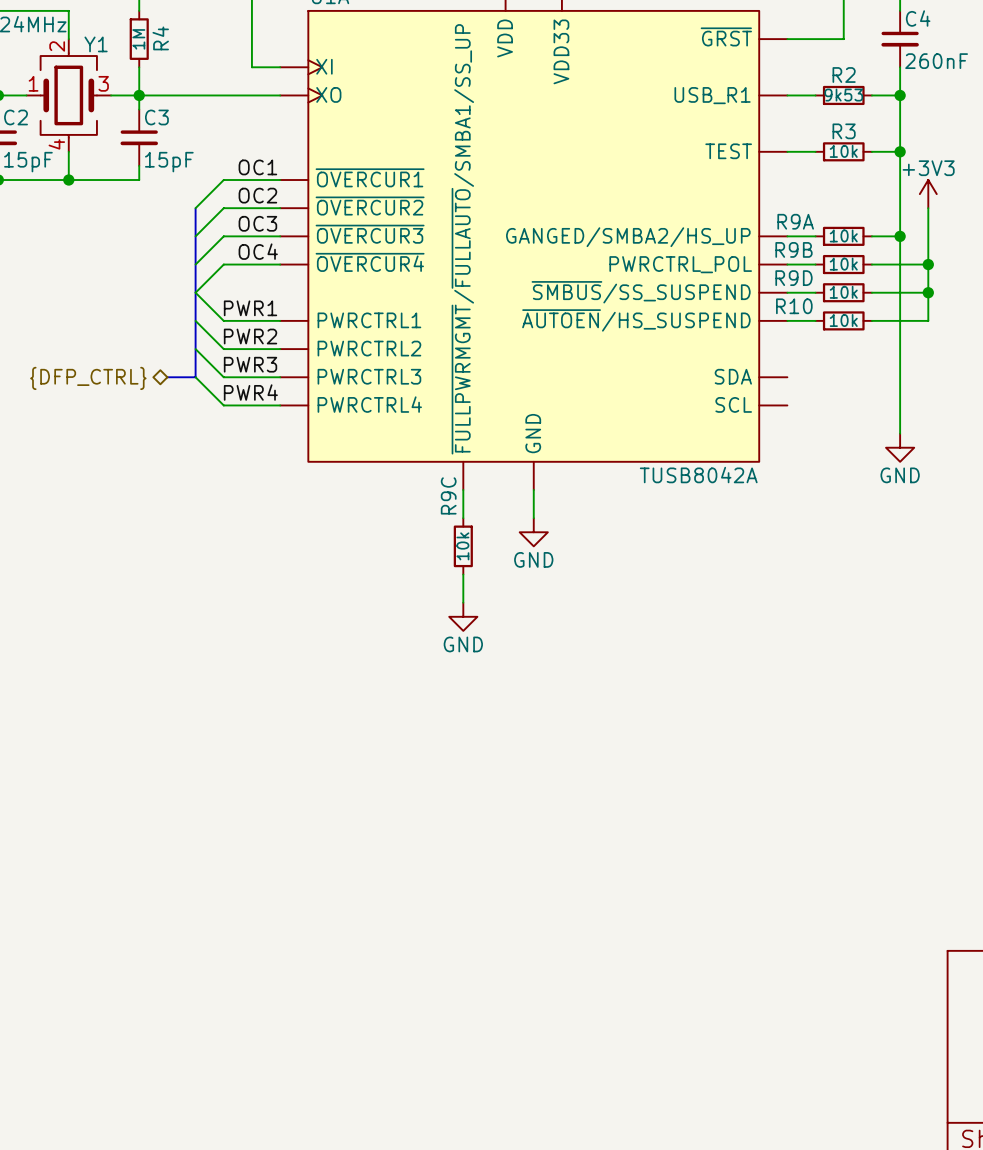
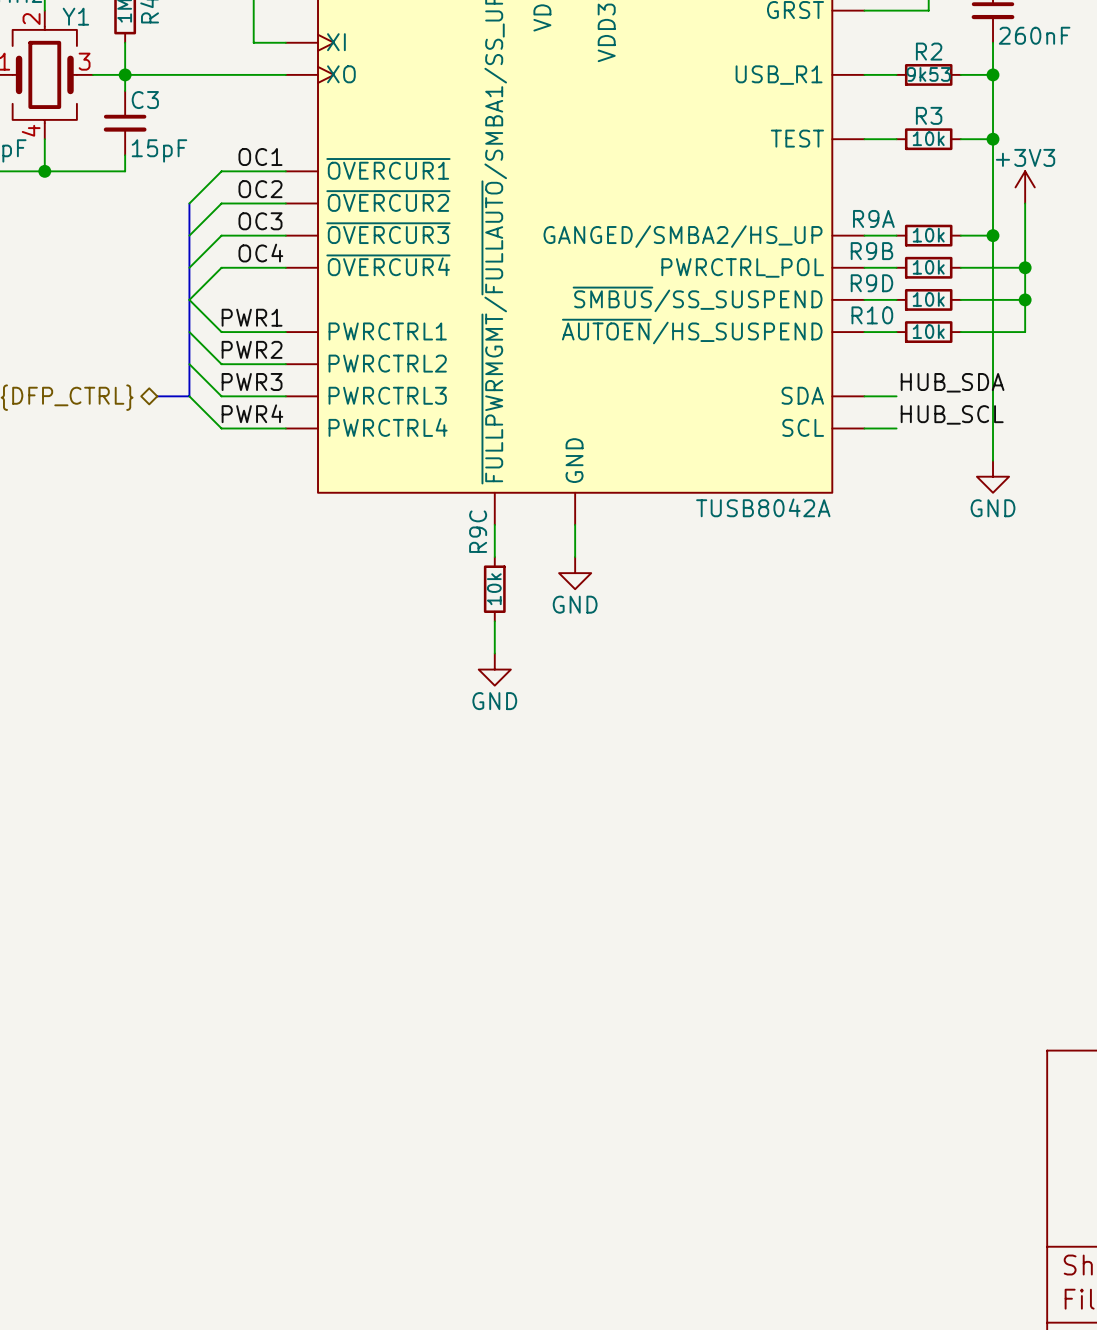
label: none -> HUB_SDA (952, 382)
wire: none -> (864, 396) (896, 396)
label: none -> HUB_SCL (952, 414)
wire: none -> (864, 428) (896, 428)

